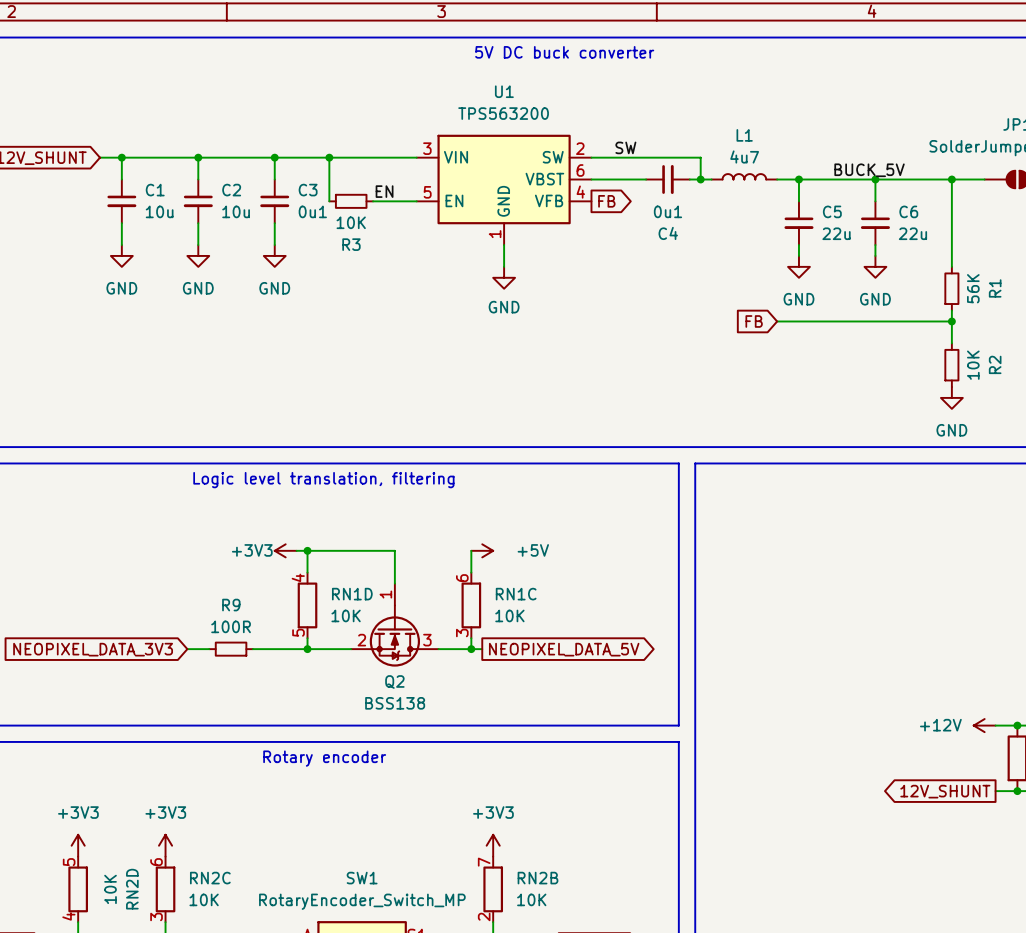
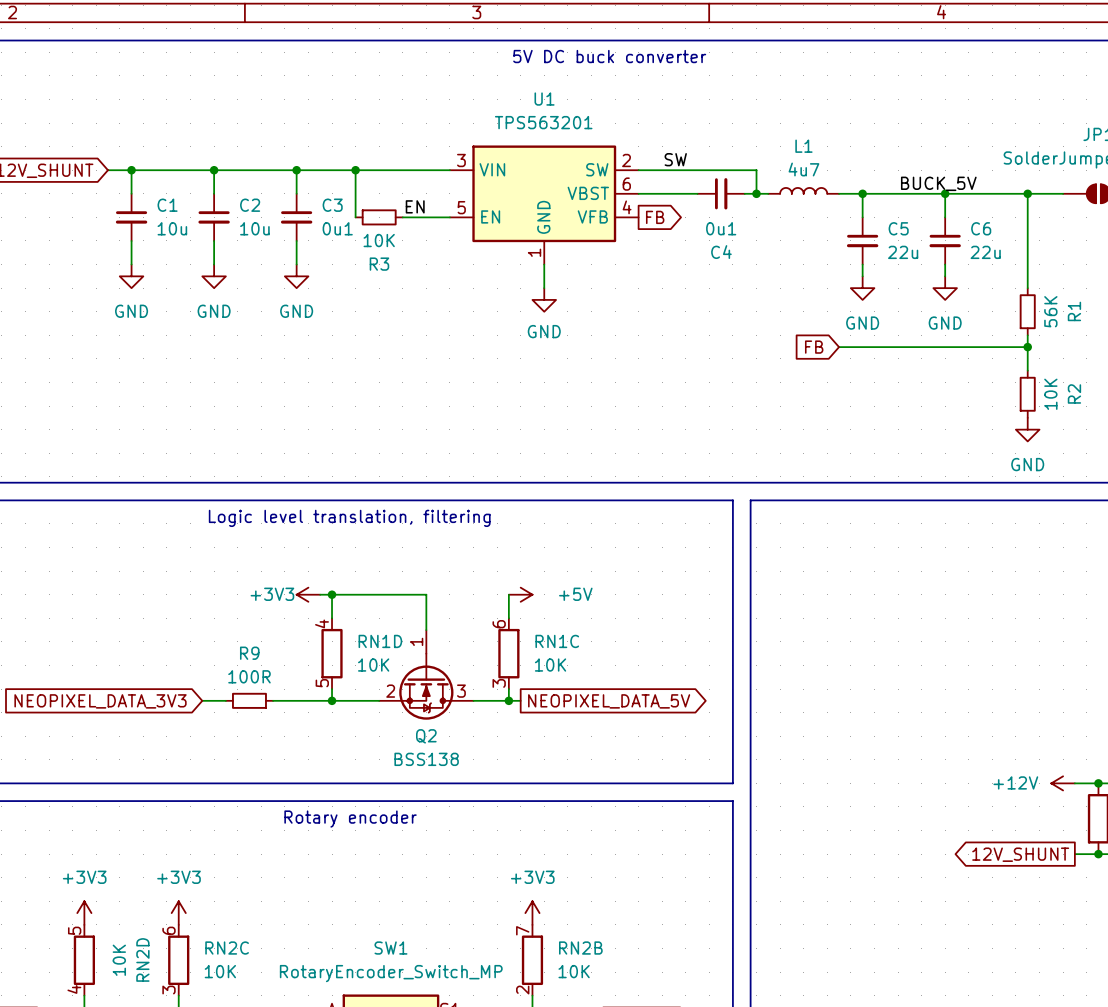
U1 value: TPS563200 (503, 113) -> TPS563201 (543, 122)

